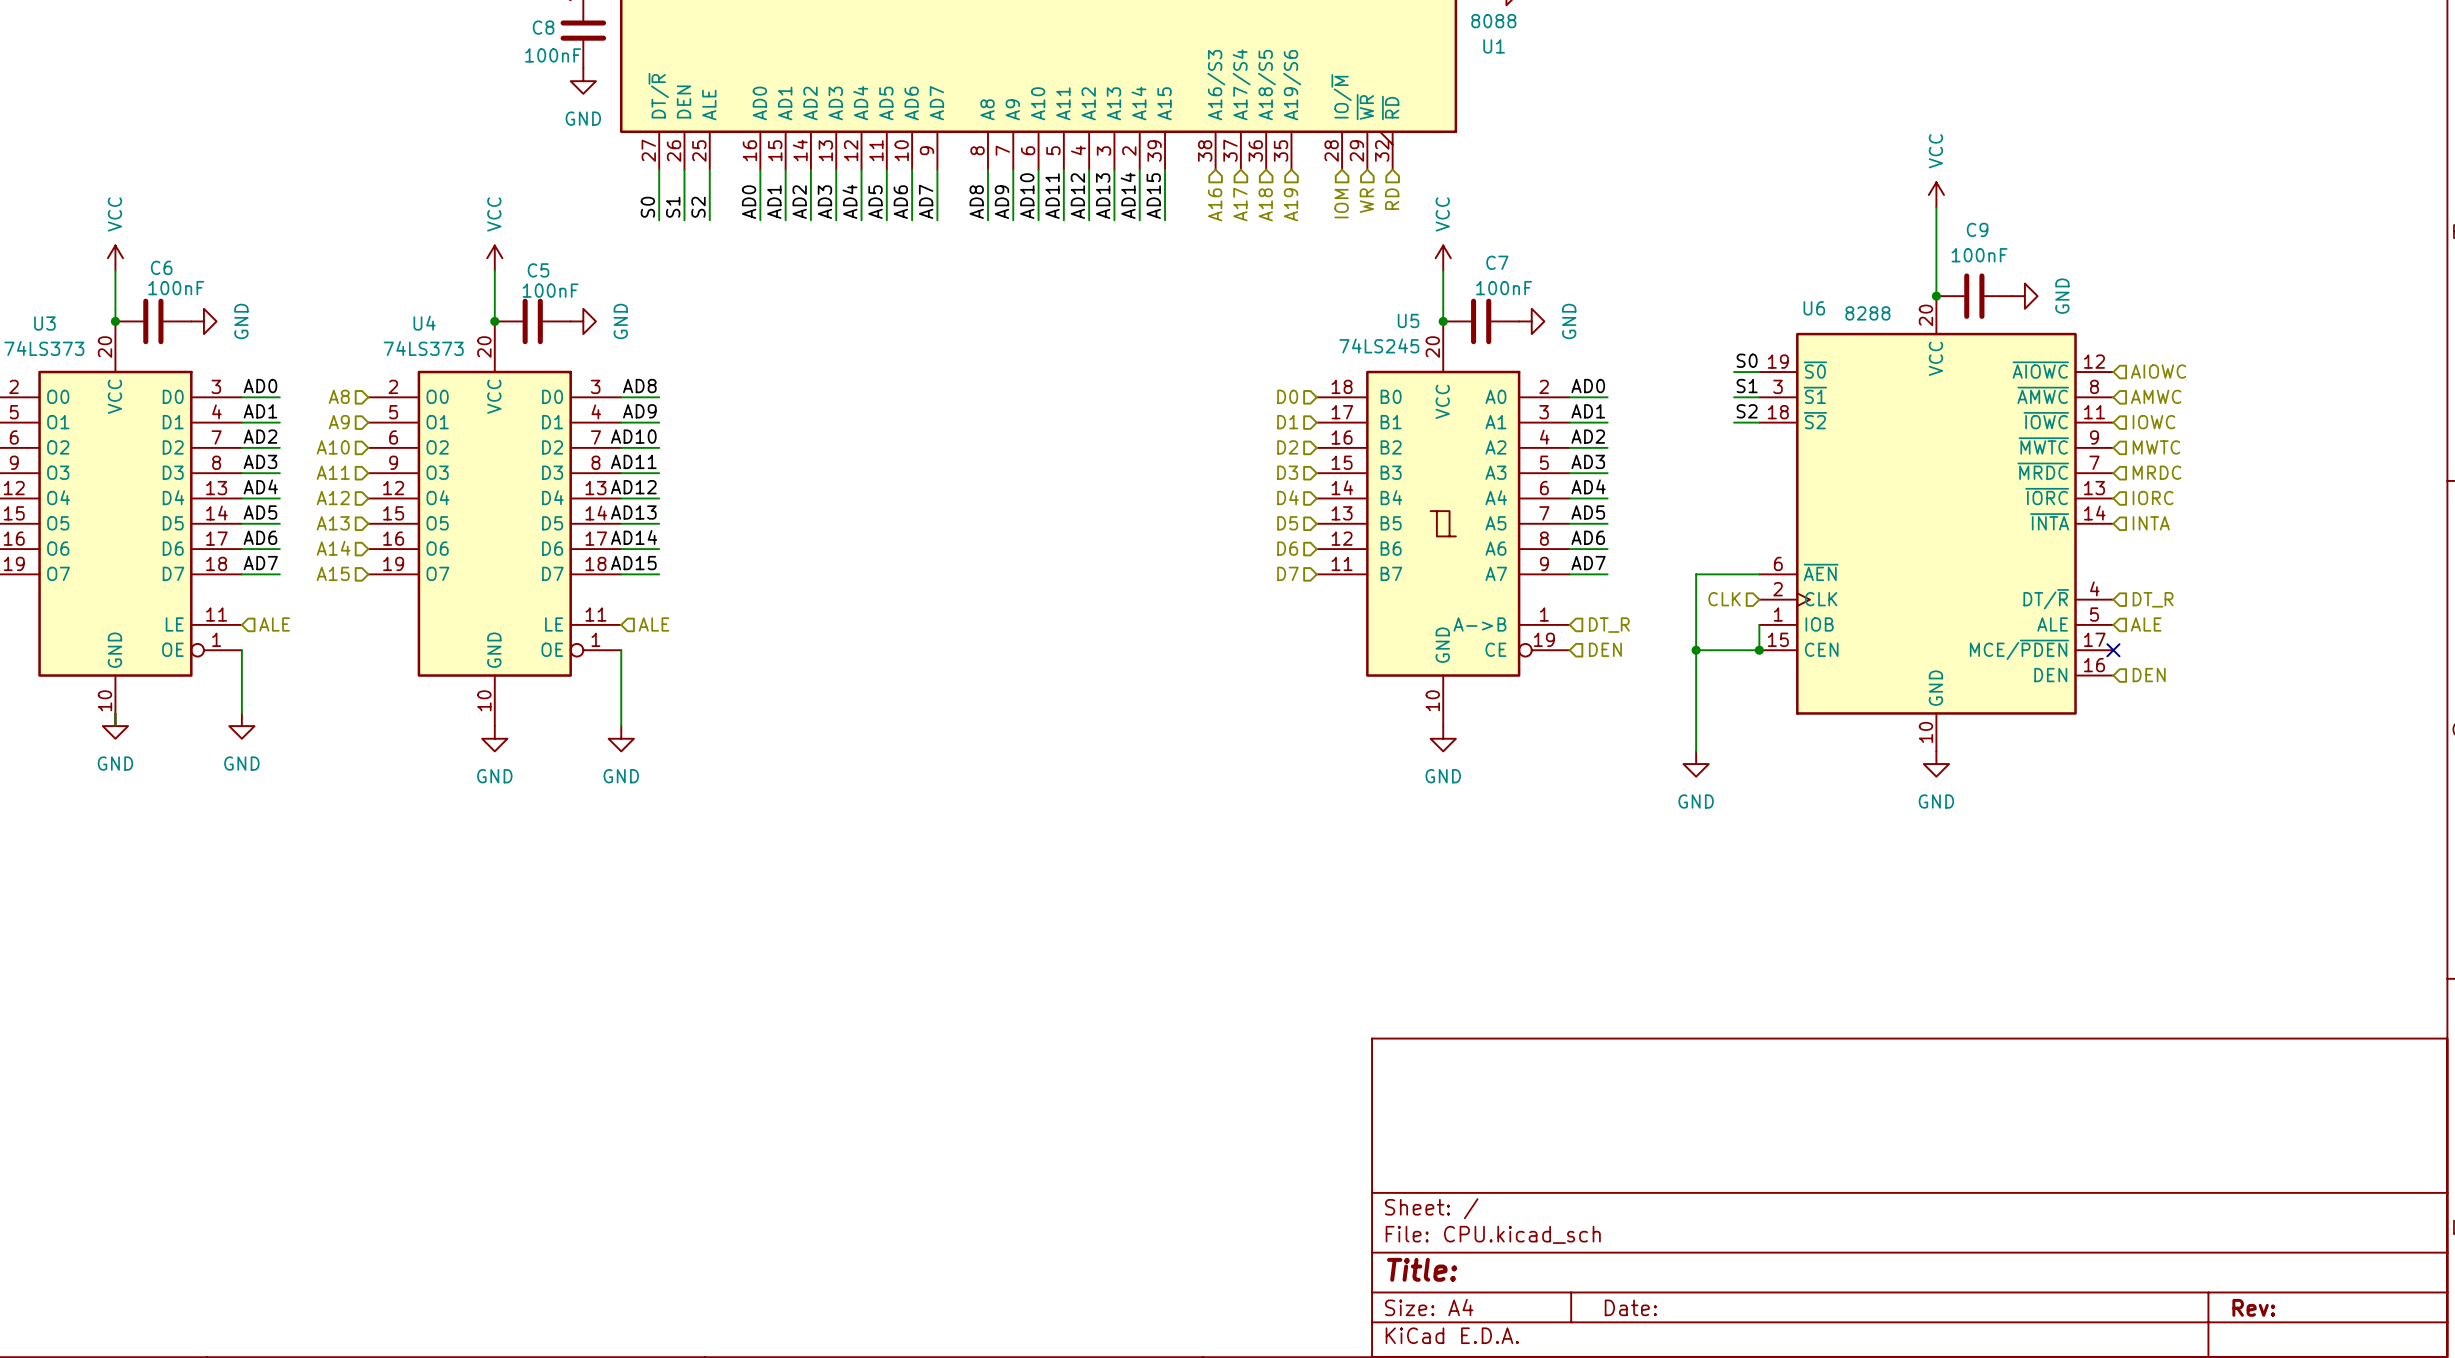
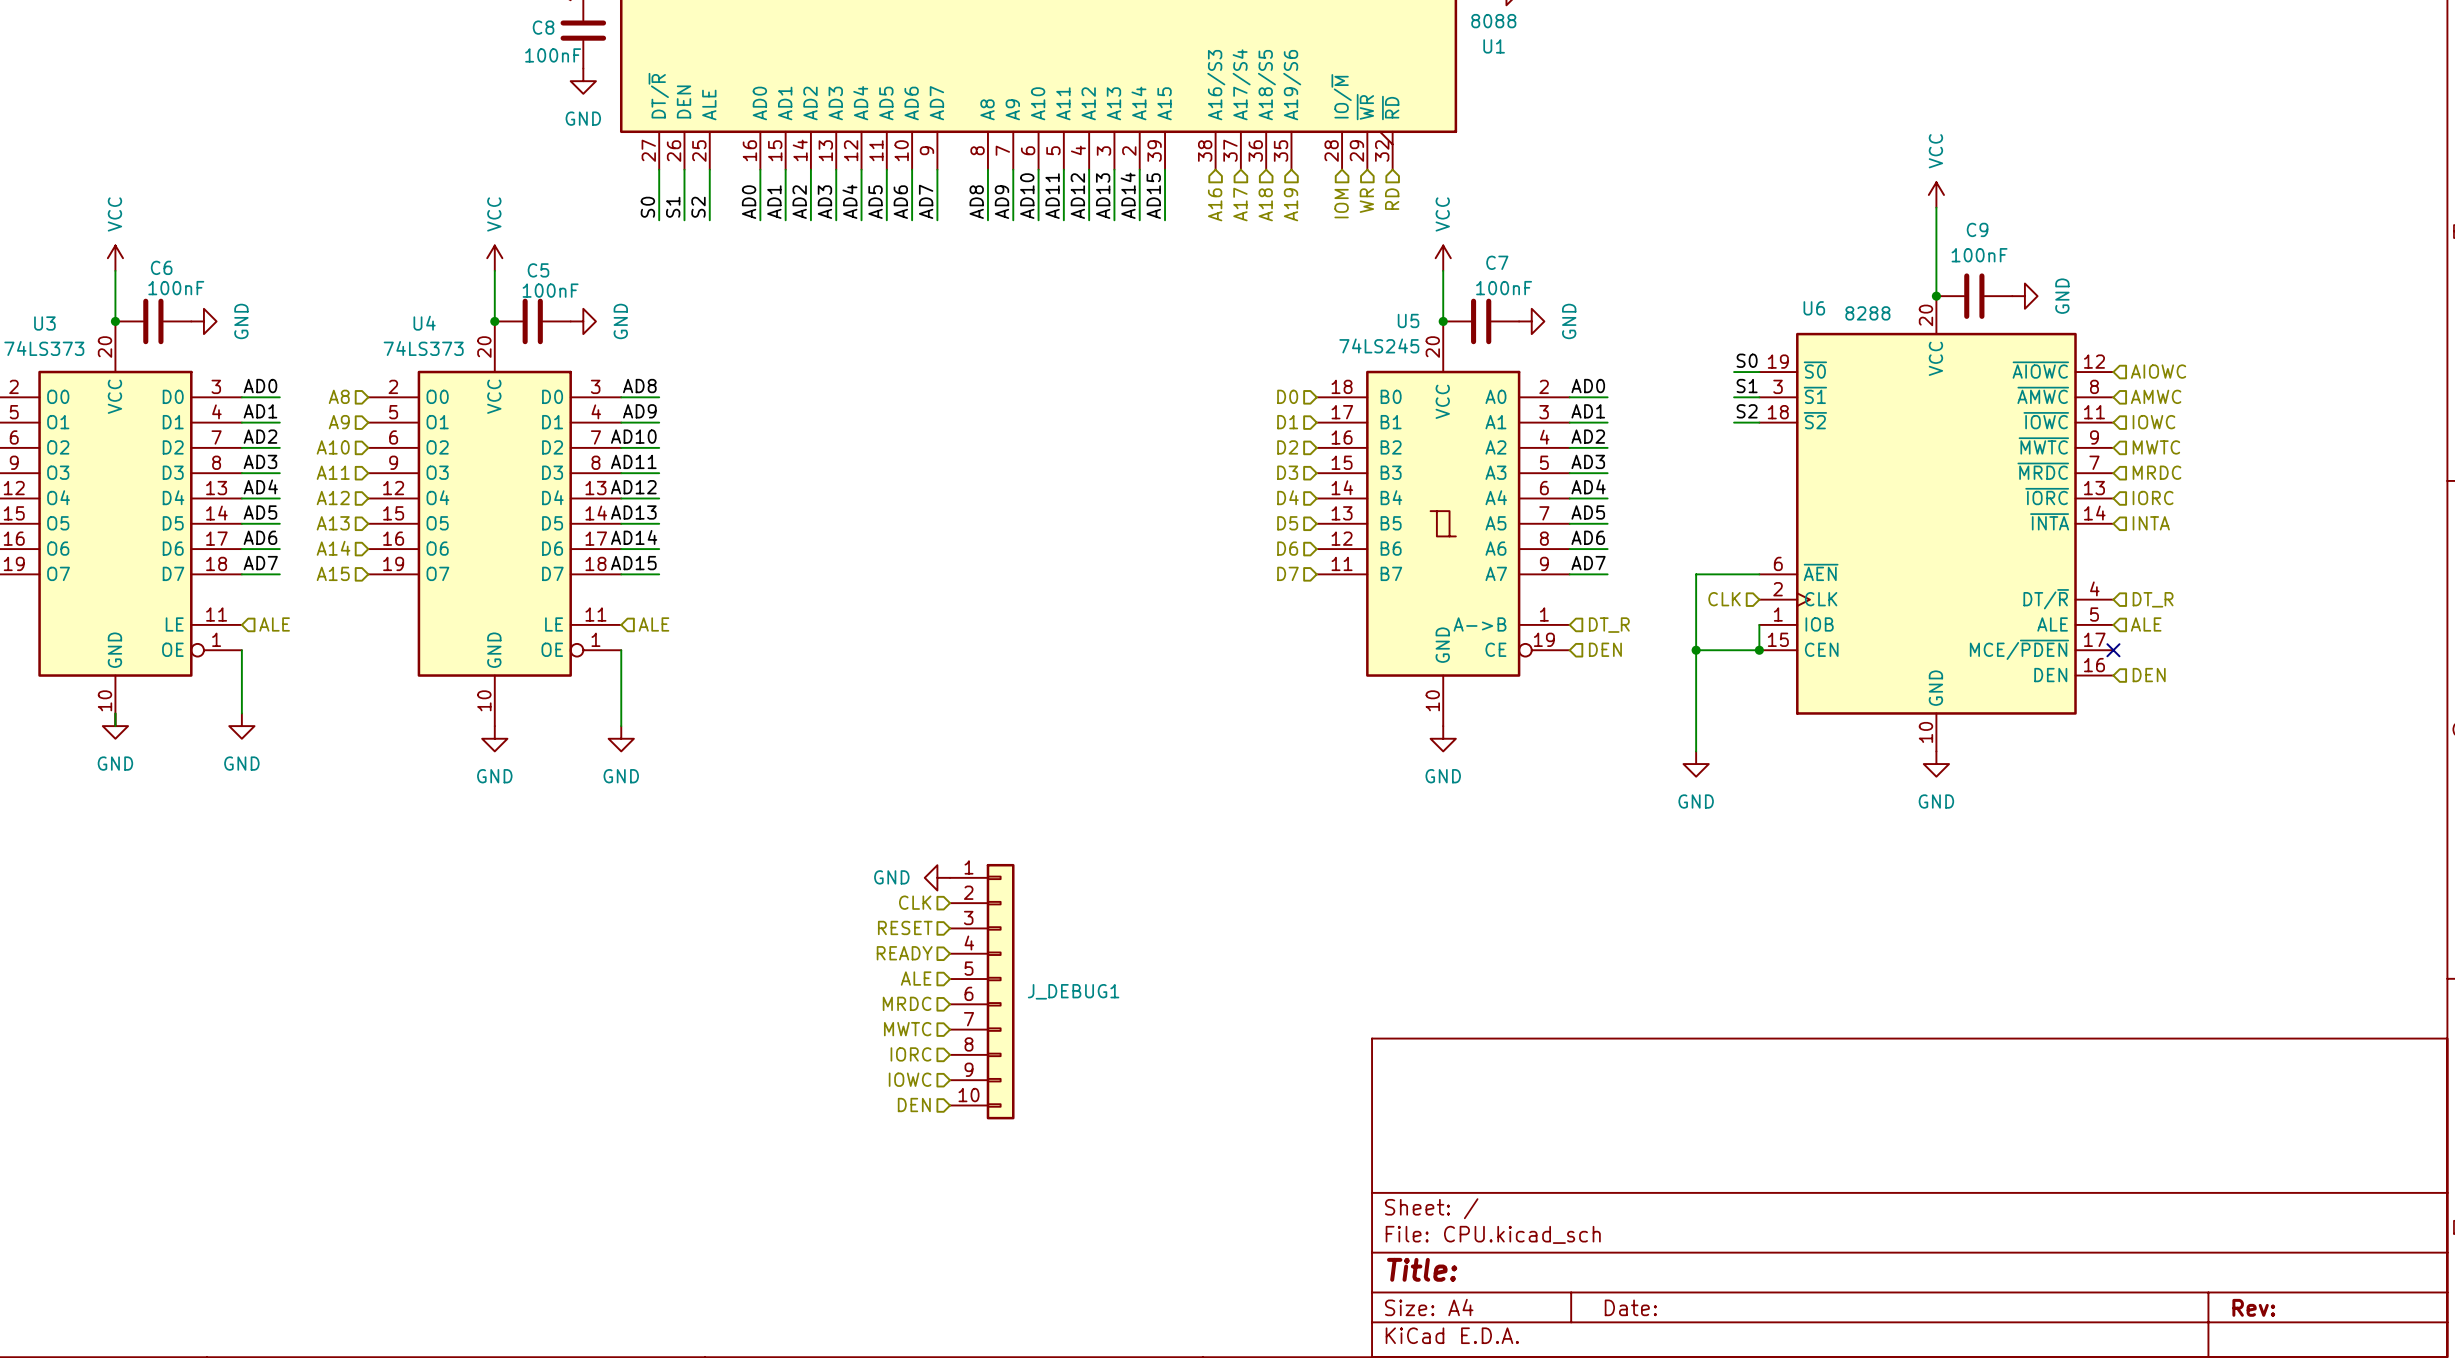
power symbol: none -> GND (937, 877)
hierarchical label: none -> CLK (915, 902)
hierarchical label: none -> RESET (905, 927)
hierarchical label: none -> READY (904, 953)
hierarchical label: none -> ALE (916, 978)
J_DEBUG1: none -> (982, 991)
hierarchical label: none -> MRDC (907, 1003)
hierarchical label: none -> MWTC (907, 1029)
hierarchical label: none -> IORC (911, 1054)
hierarchical label: none -> IOWC (910, 1079)
hierarchical label: none -> DEN (914, 1105)

